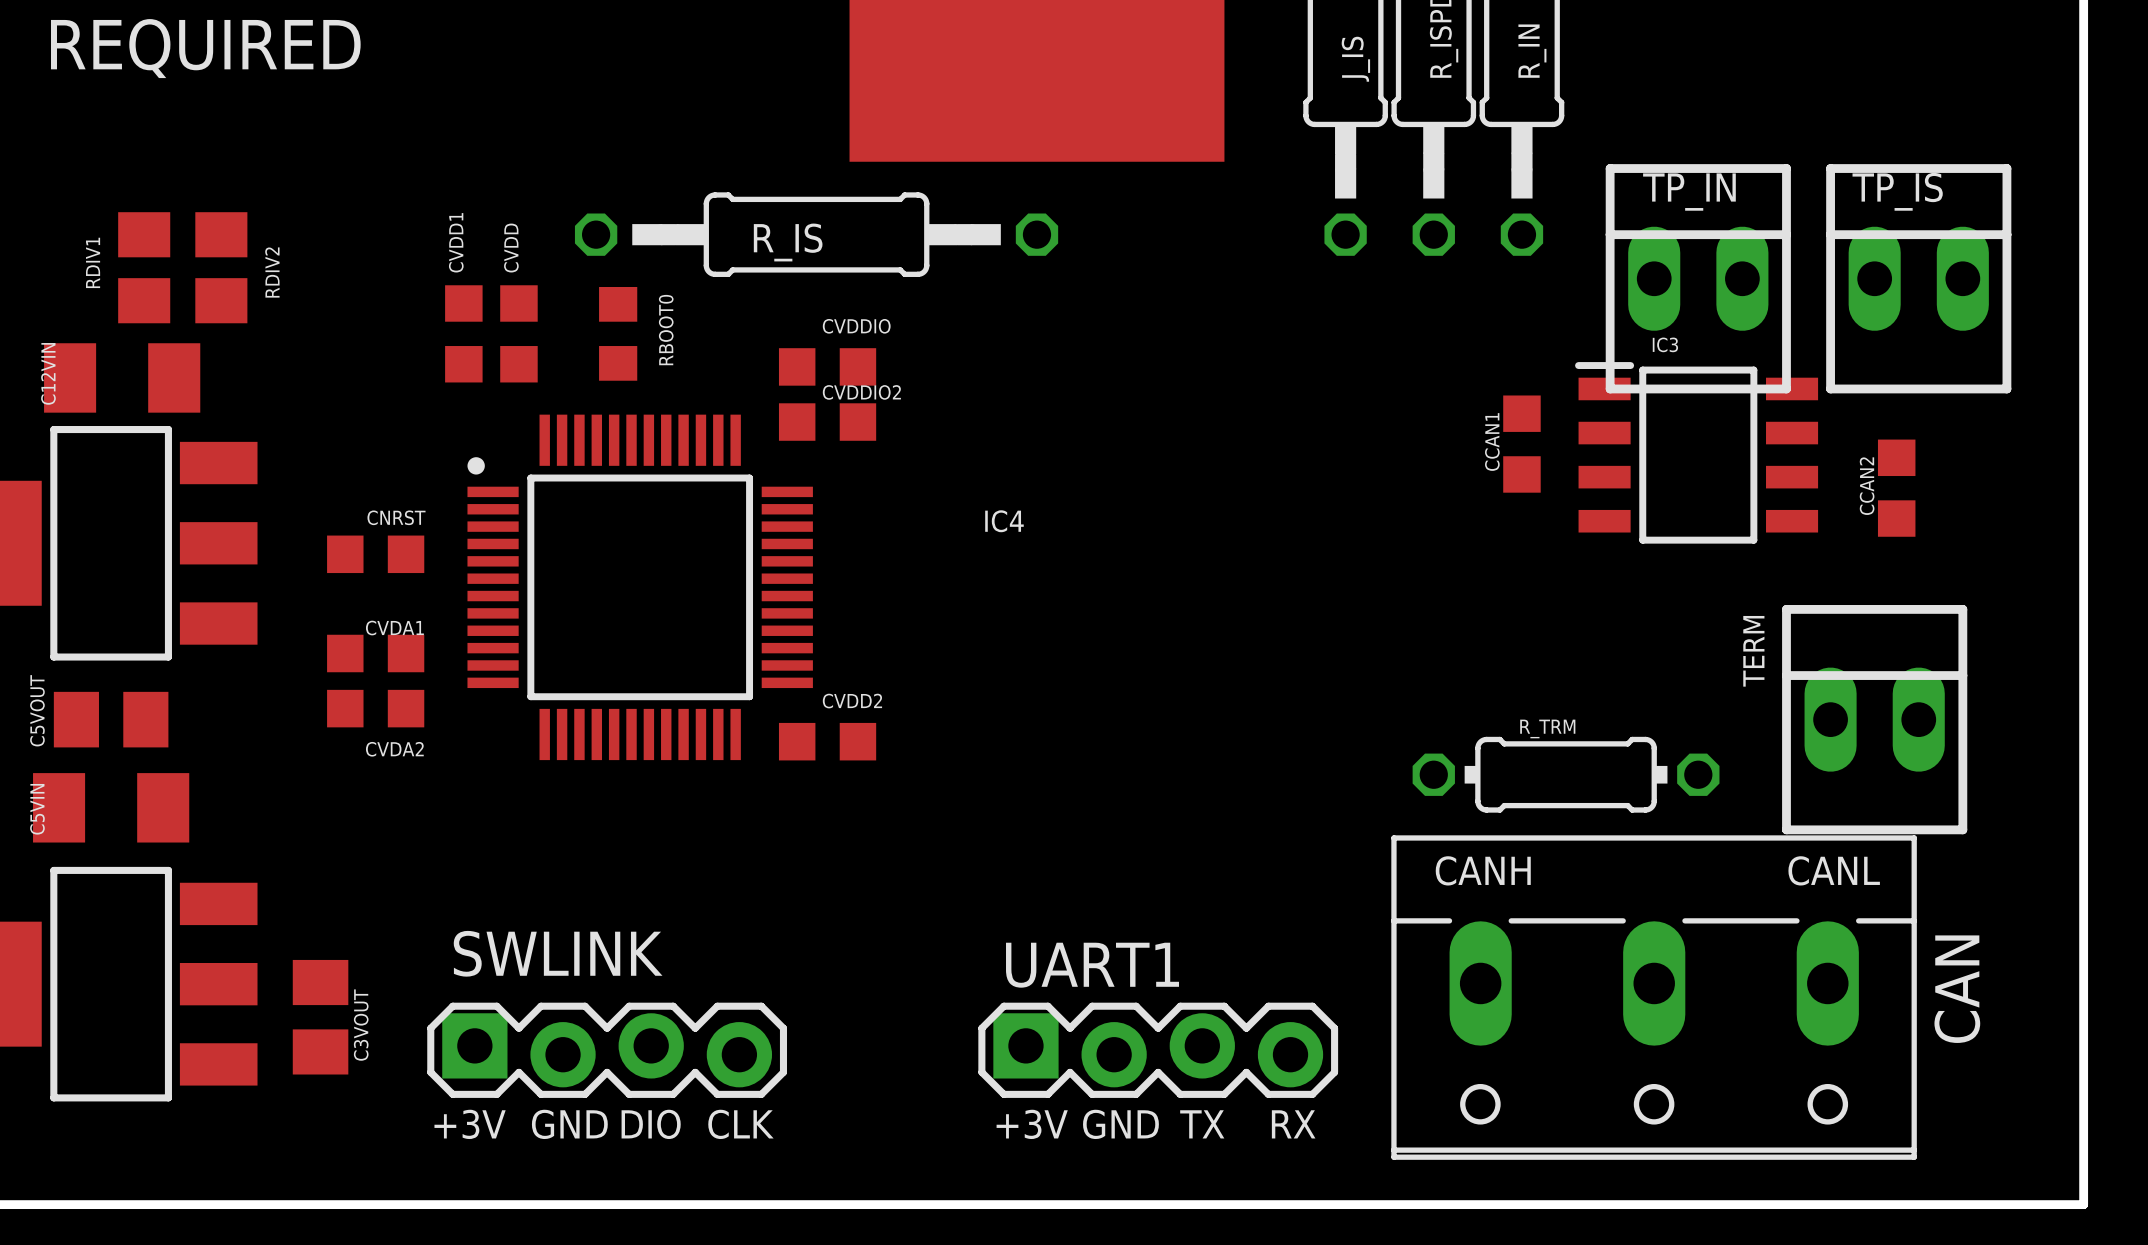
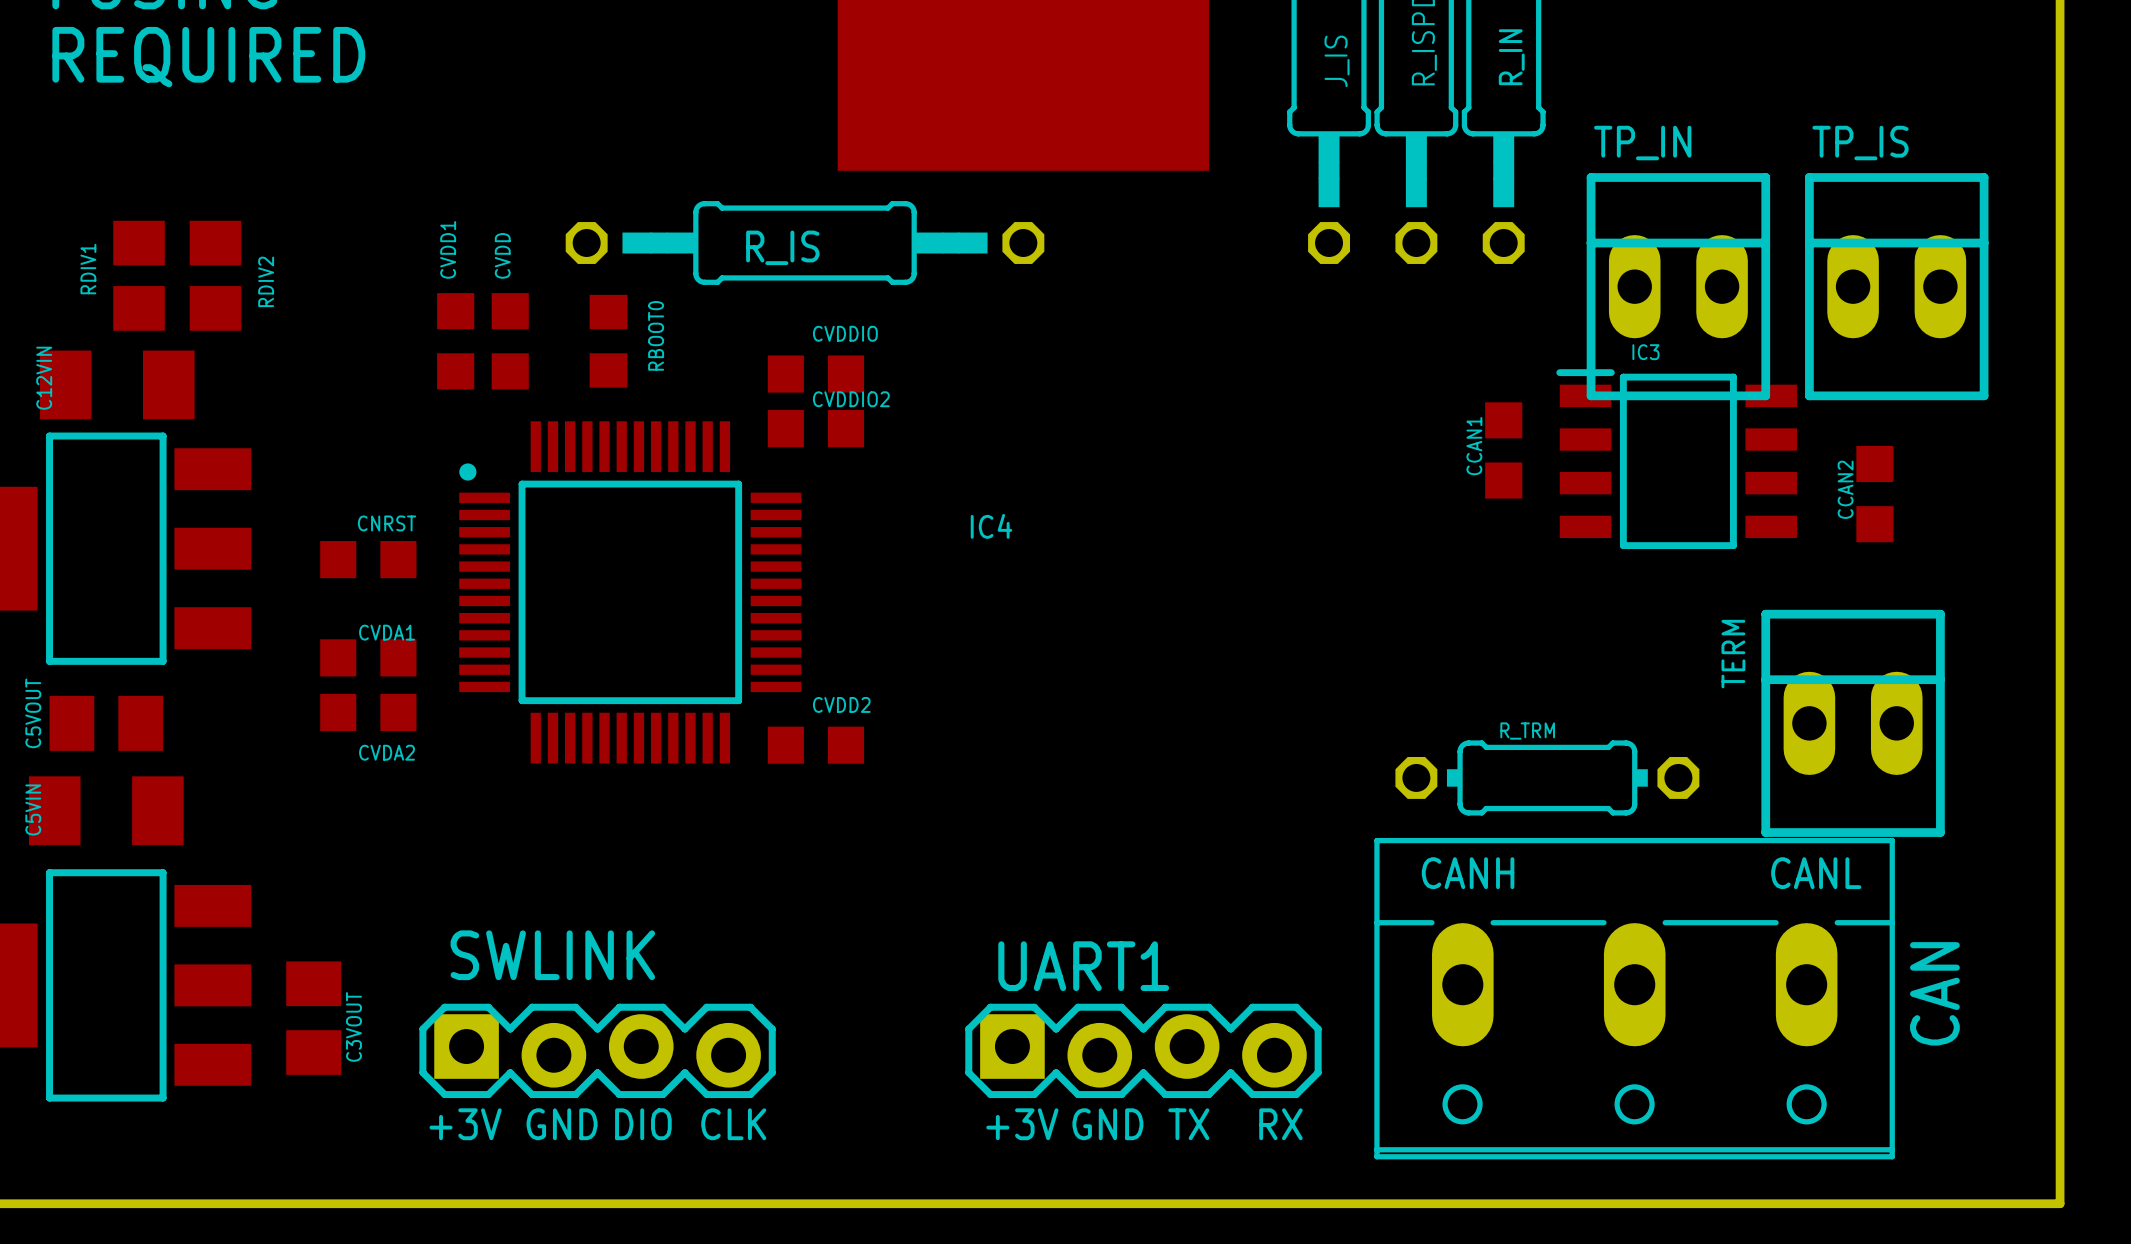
TP_IS name position: TP_IS (1897, 191) -> TP_IS (1860, 143)
TP_IN name position: TP_IN (1689, 192) -> TP_IN (1642, 143)

